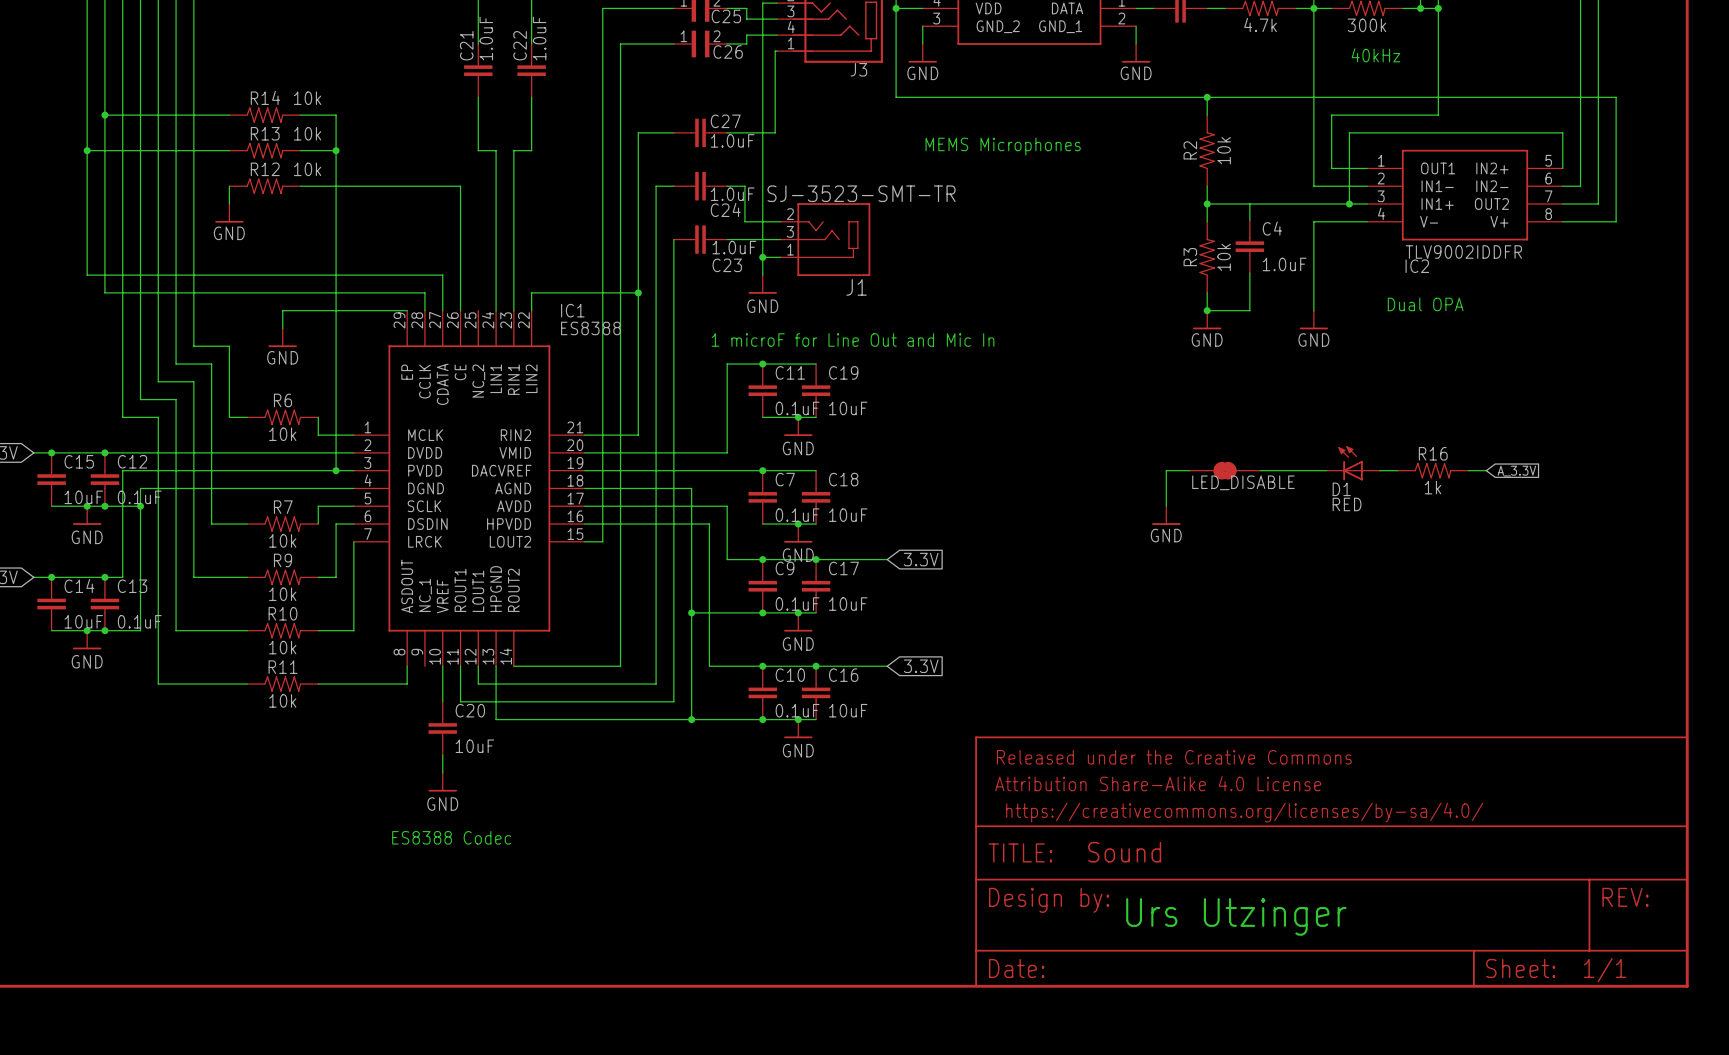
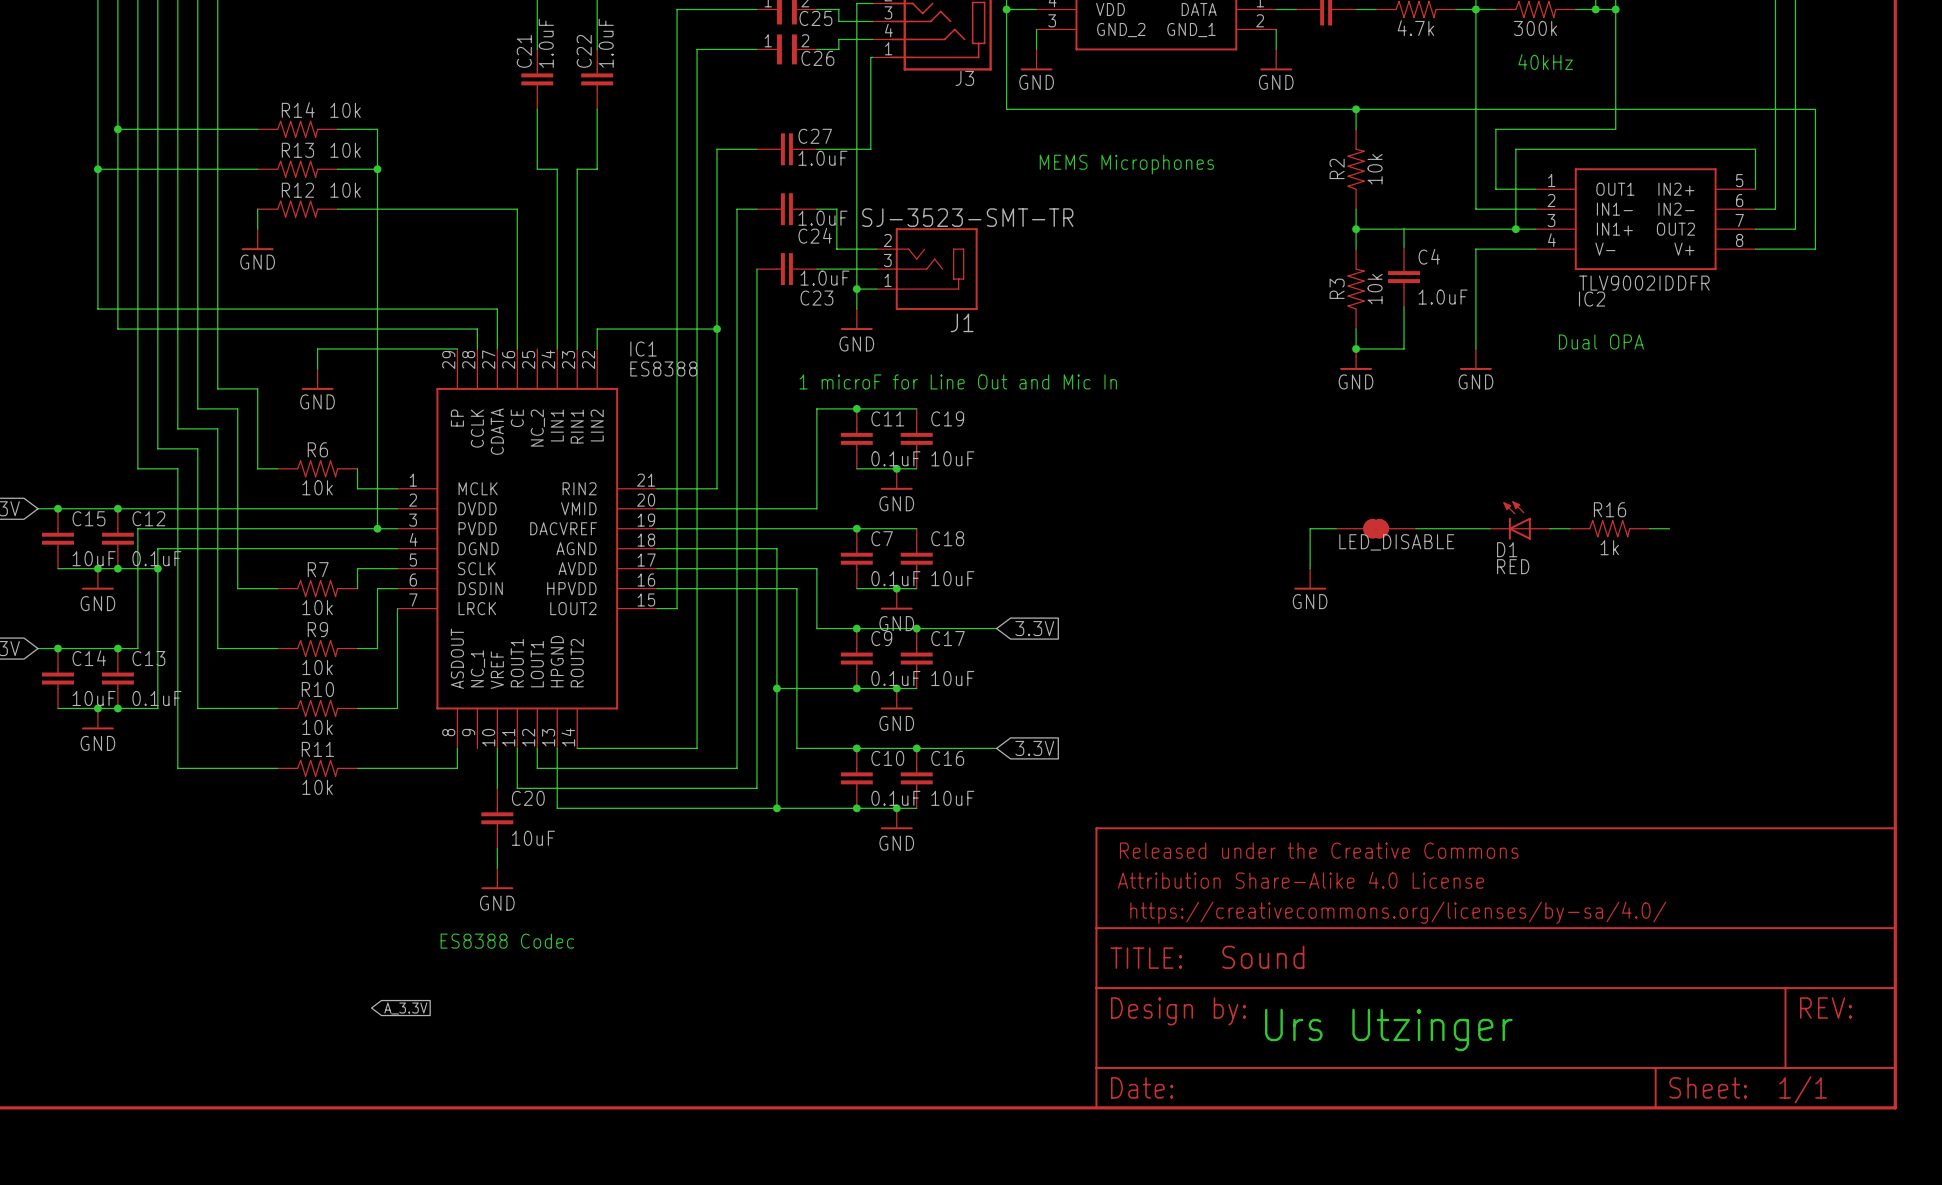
global label: A_3.3V (1516, 471) -> none
global label: none -> A_3.3V (405, 1008)

